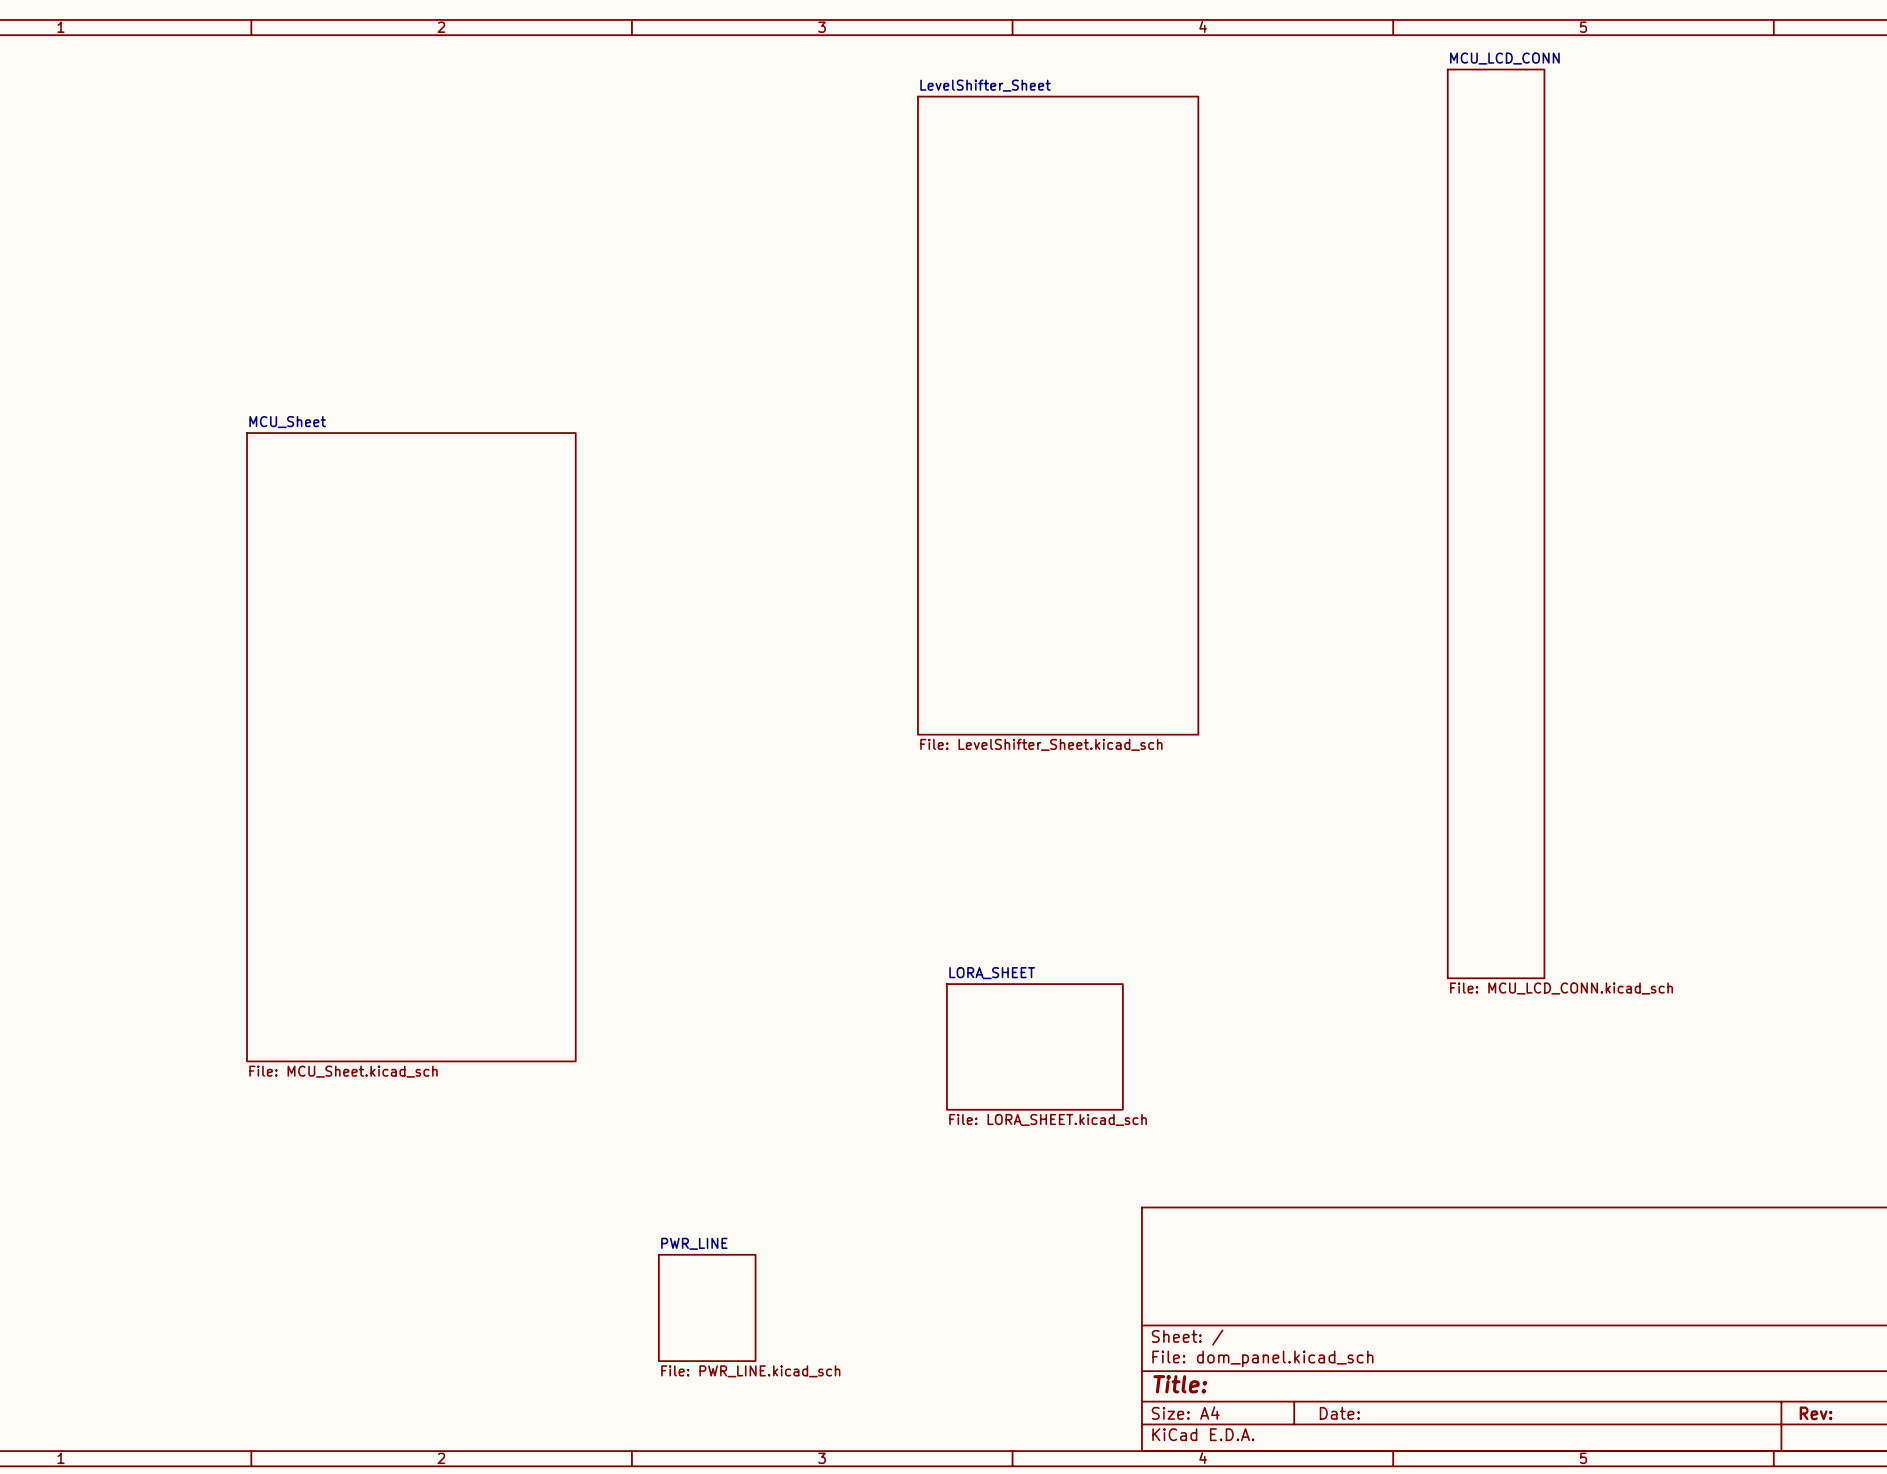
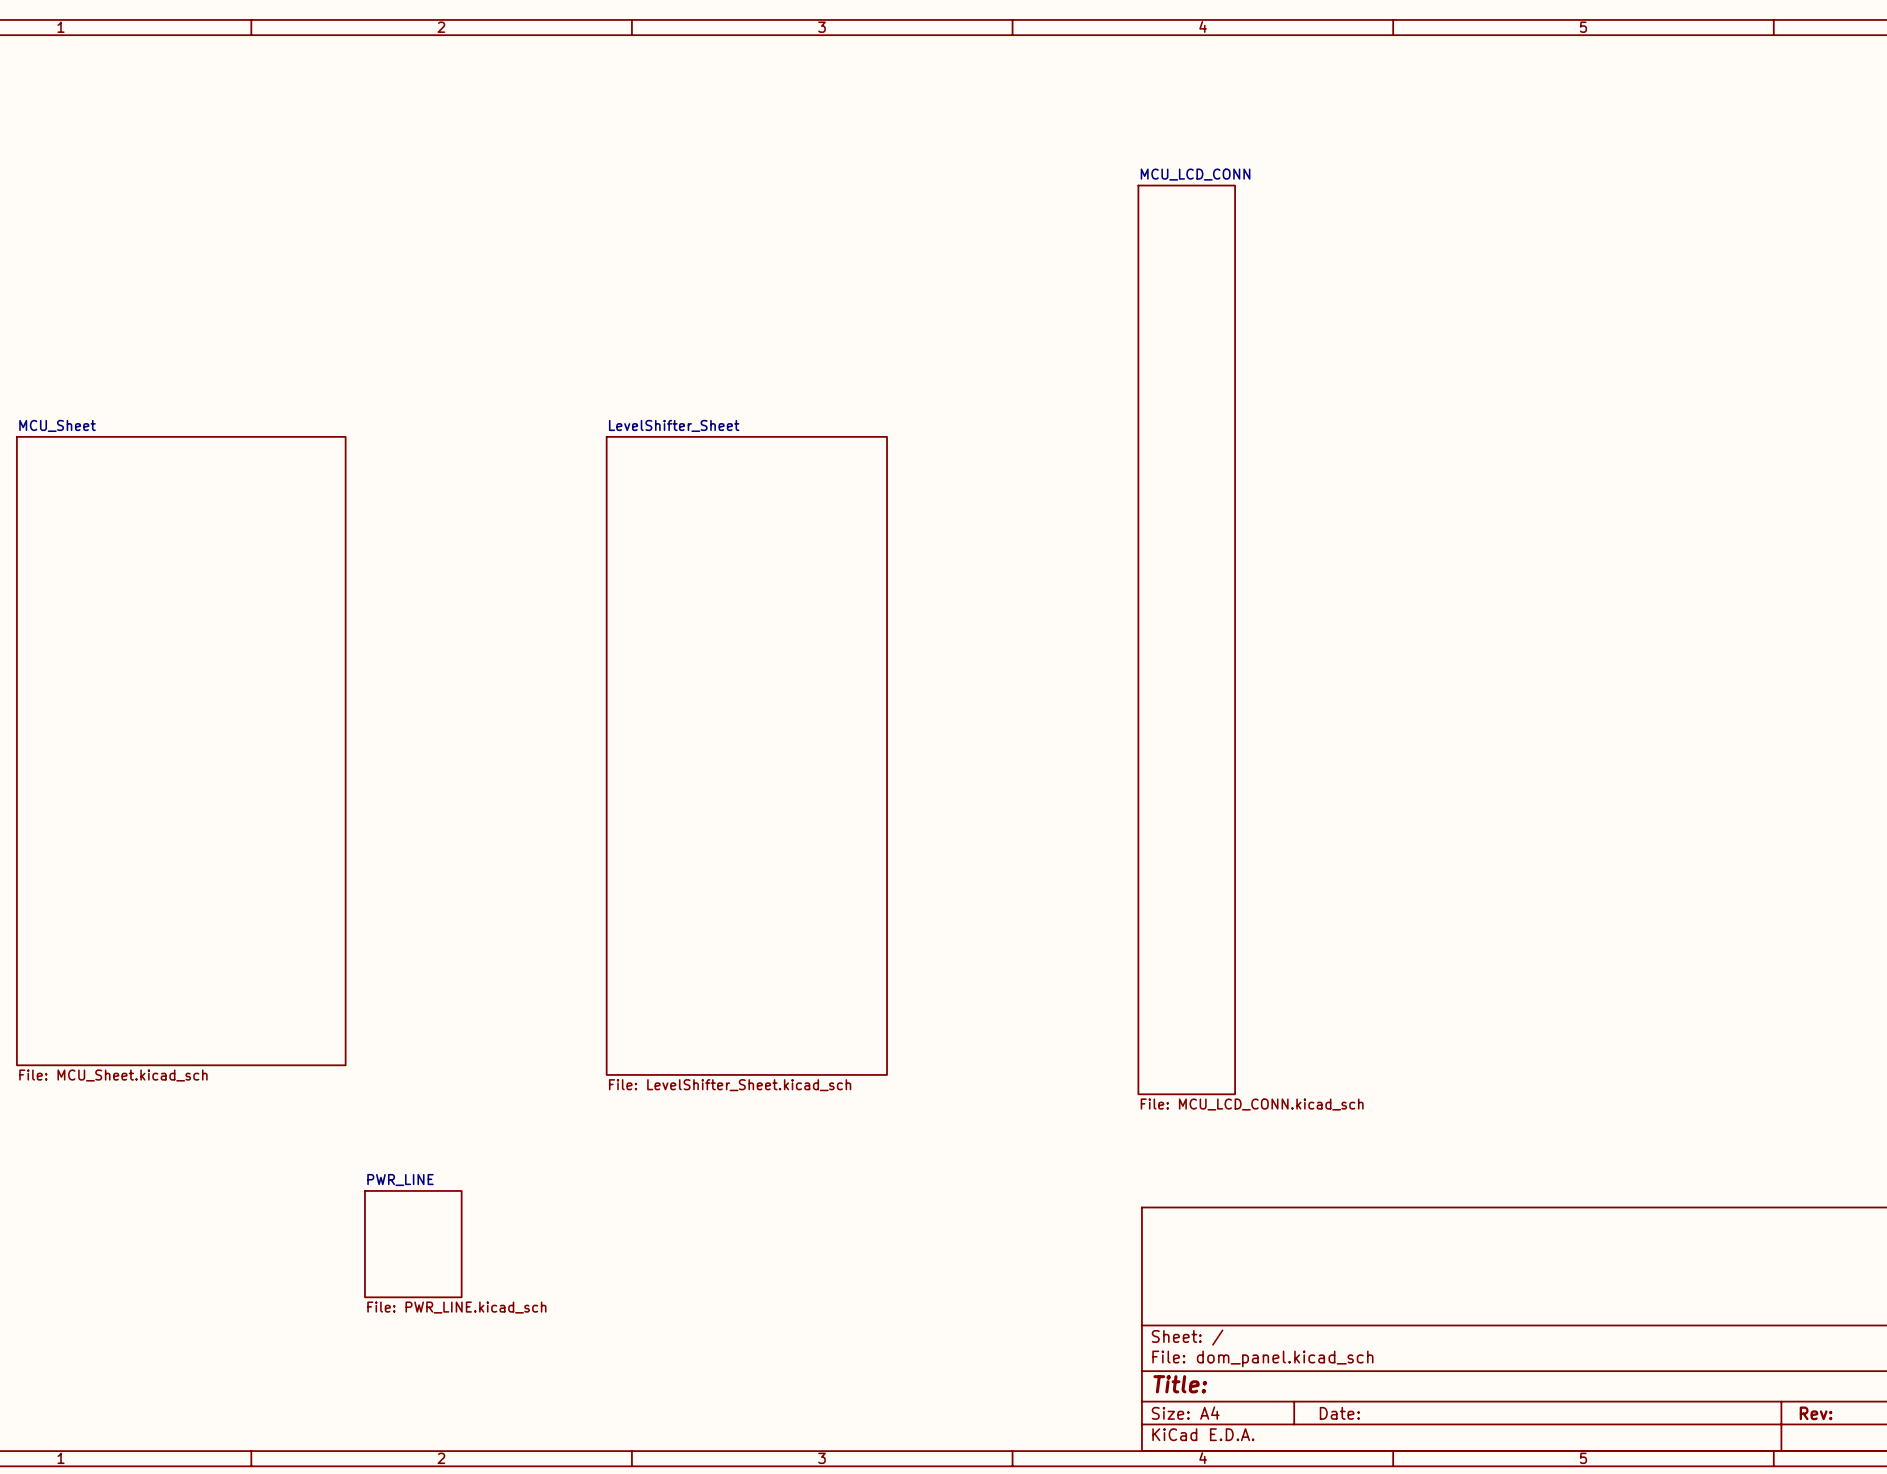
sheet LevelShifter_Sheet: File: LevelShifter_Sheet.kicad_sch (1058, 415) -> none
sheet MCU_LCD_CONN: File: MCU_LCD_CONN.kicad_sch (1496, 523) -> none
sheet MCU_LCD_CONN: none -> File: MCU_LCD_CONN.kicad_sch (1186, 639)
sheet MCU_Sheet: File: MCU_Sheet.kicad_sch (411, 747) -> none
sheet MCU_Sheet: none -> File: MCU_Sheet.kicad_sch (181, 751)
sheet LevelShifter_Sheet: none -> File: LevelShifter_Sheet.kicad_sch (746, 755)
sheet LORA_SHEET: File: LORA_SHEET.kicad_sch (1034, 1046) -> none
sheet PWR_LINE: none -> File: PWR_LINE.kicad_sch (413, 1244)
sheet PWR_LINE: File: PWR_LINE.kicad_sch (707, 1307) -> none

